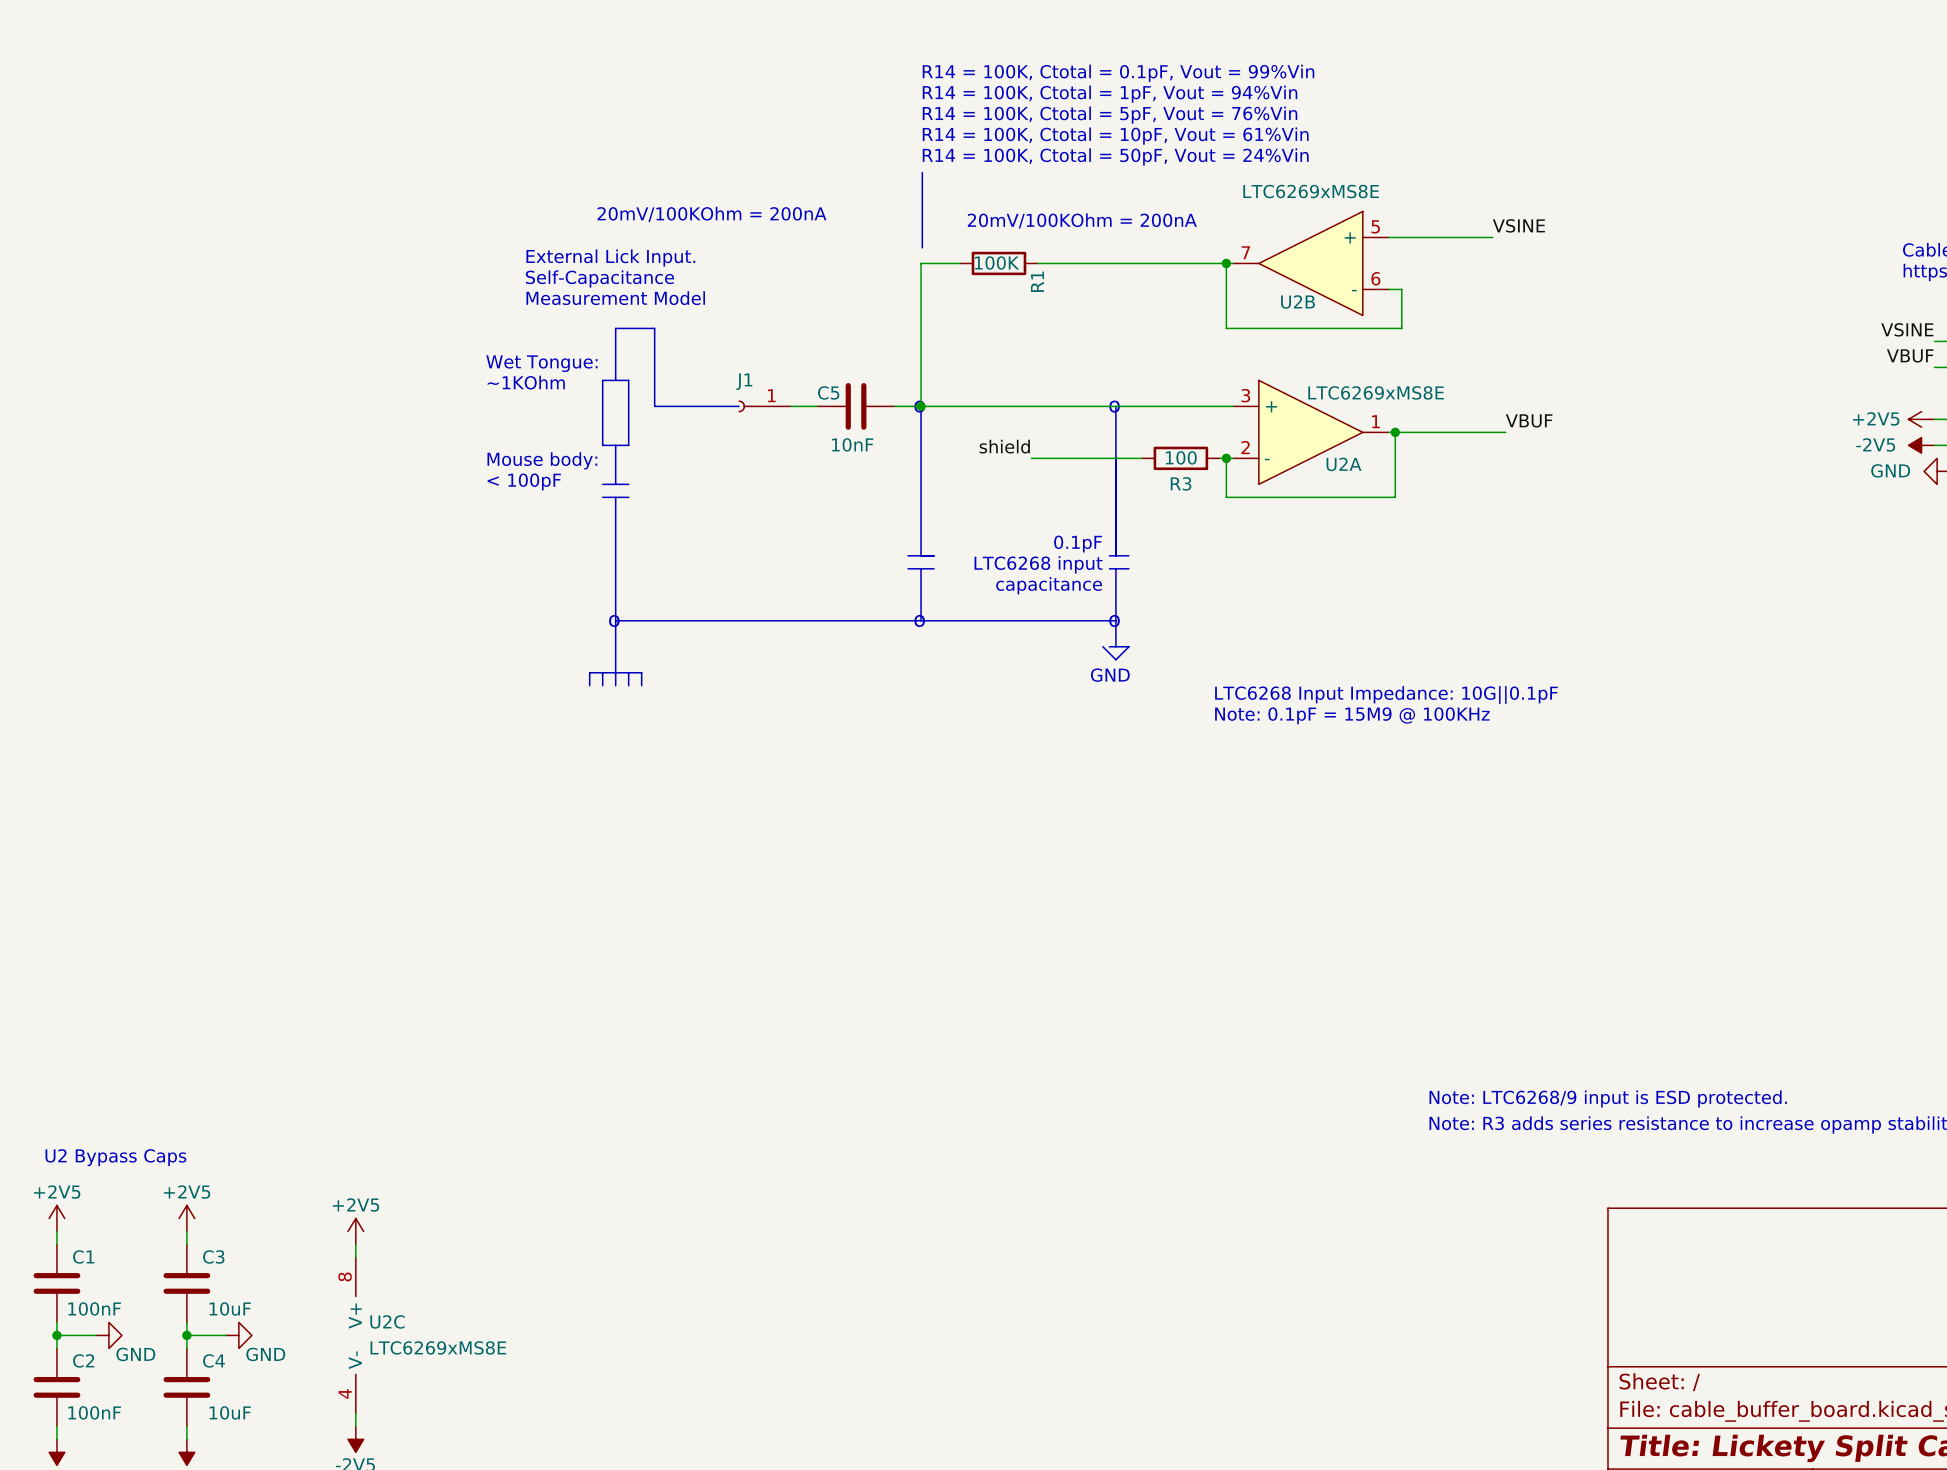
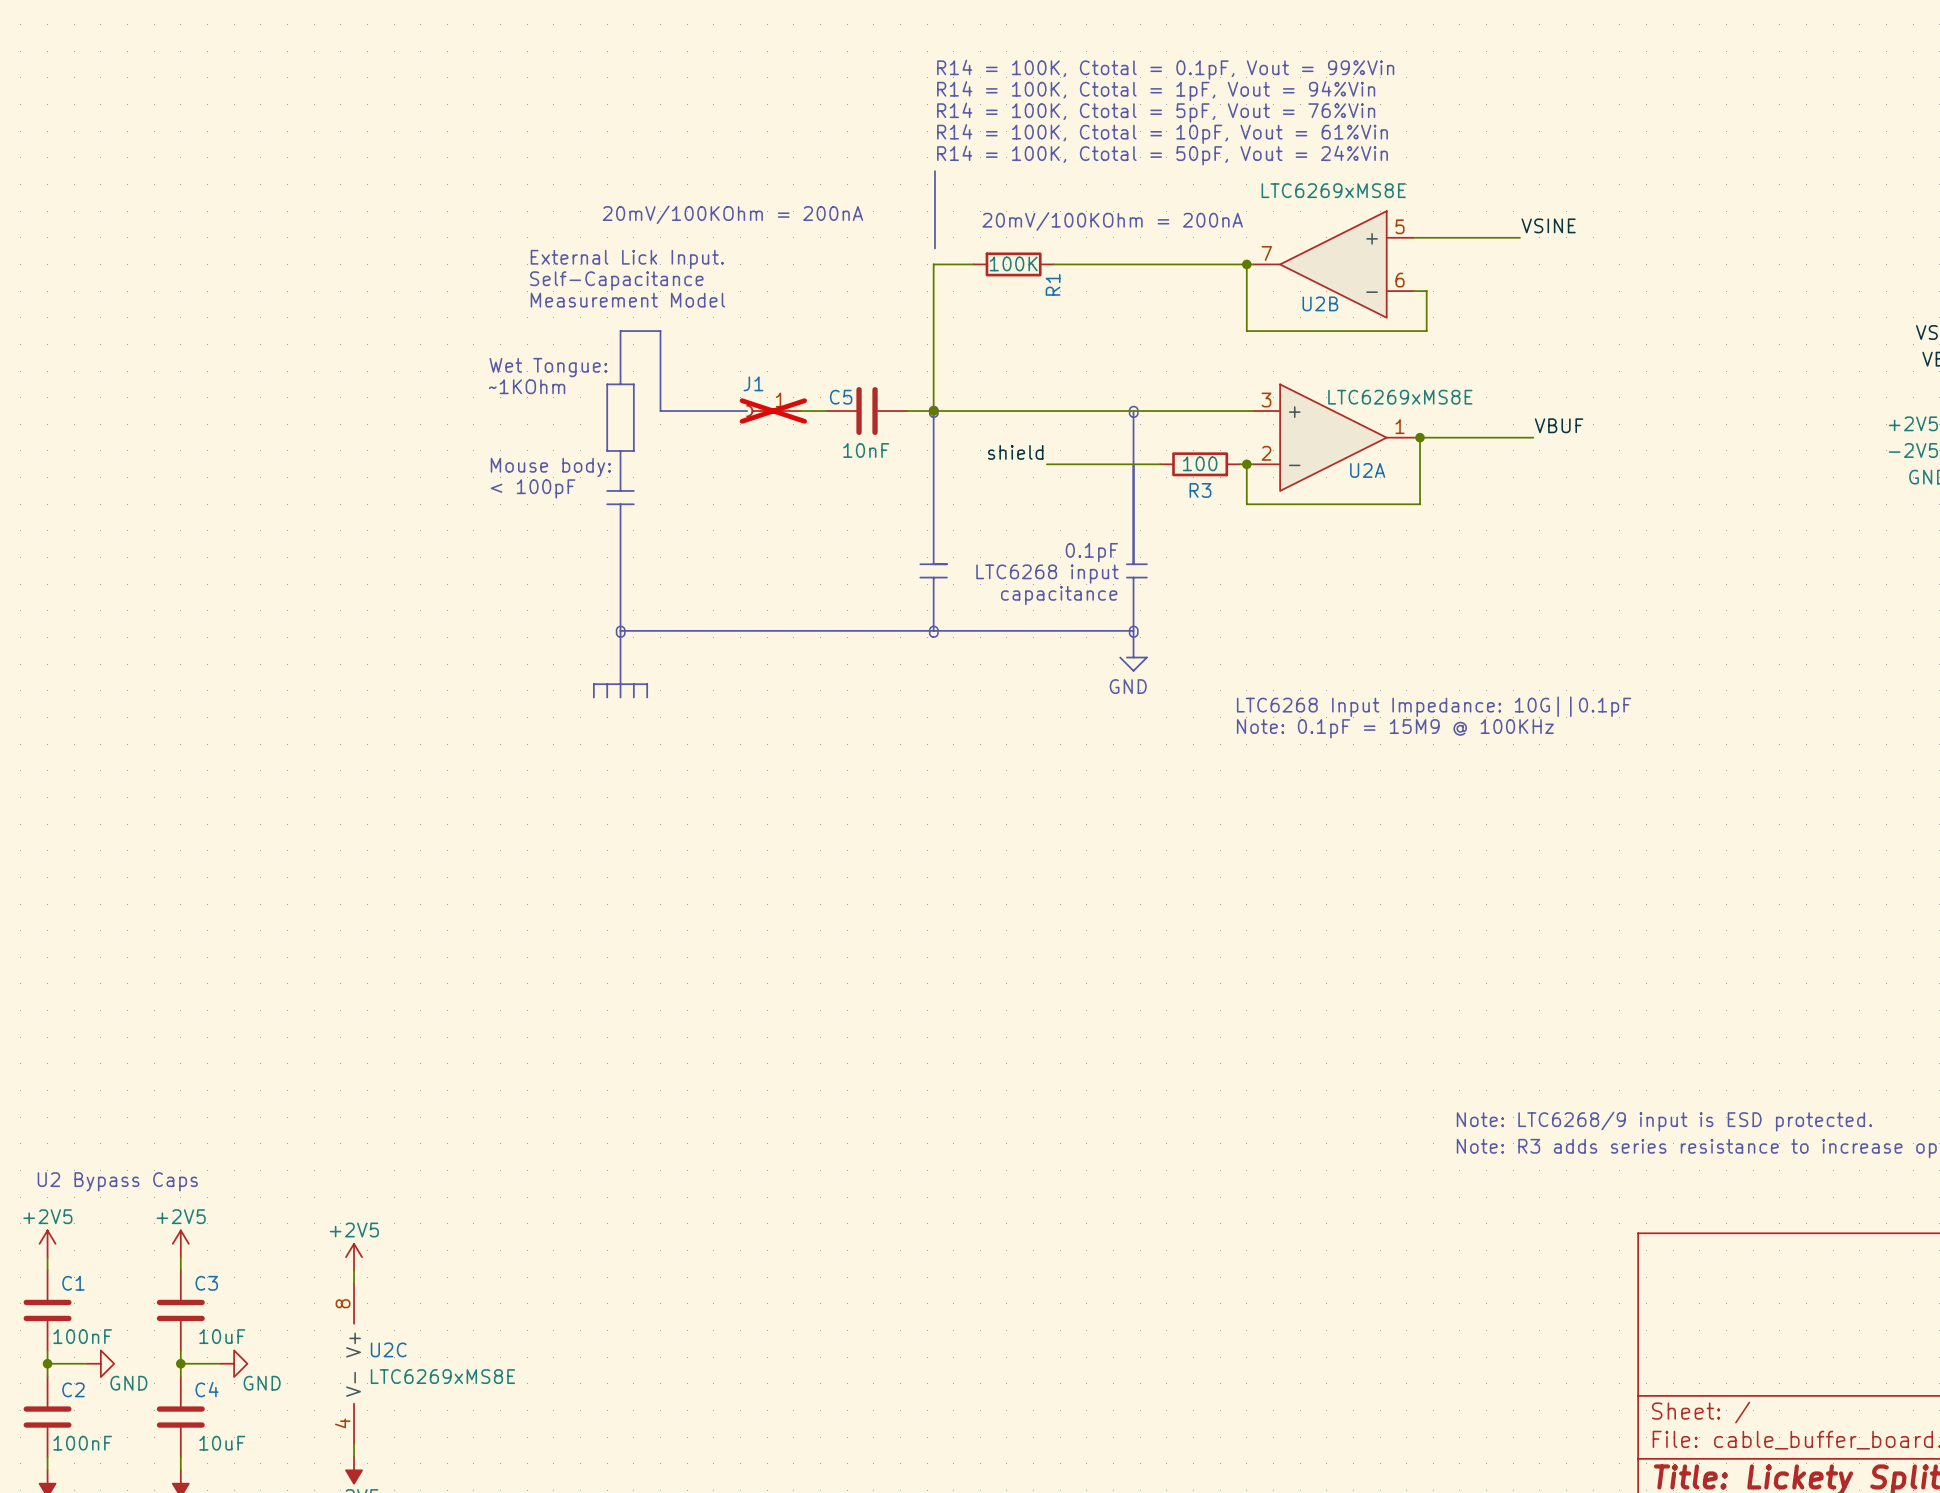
J1 do-not-place cross: none -> (773, 411)

